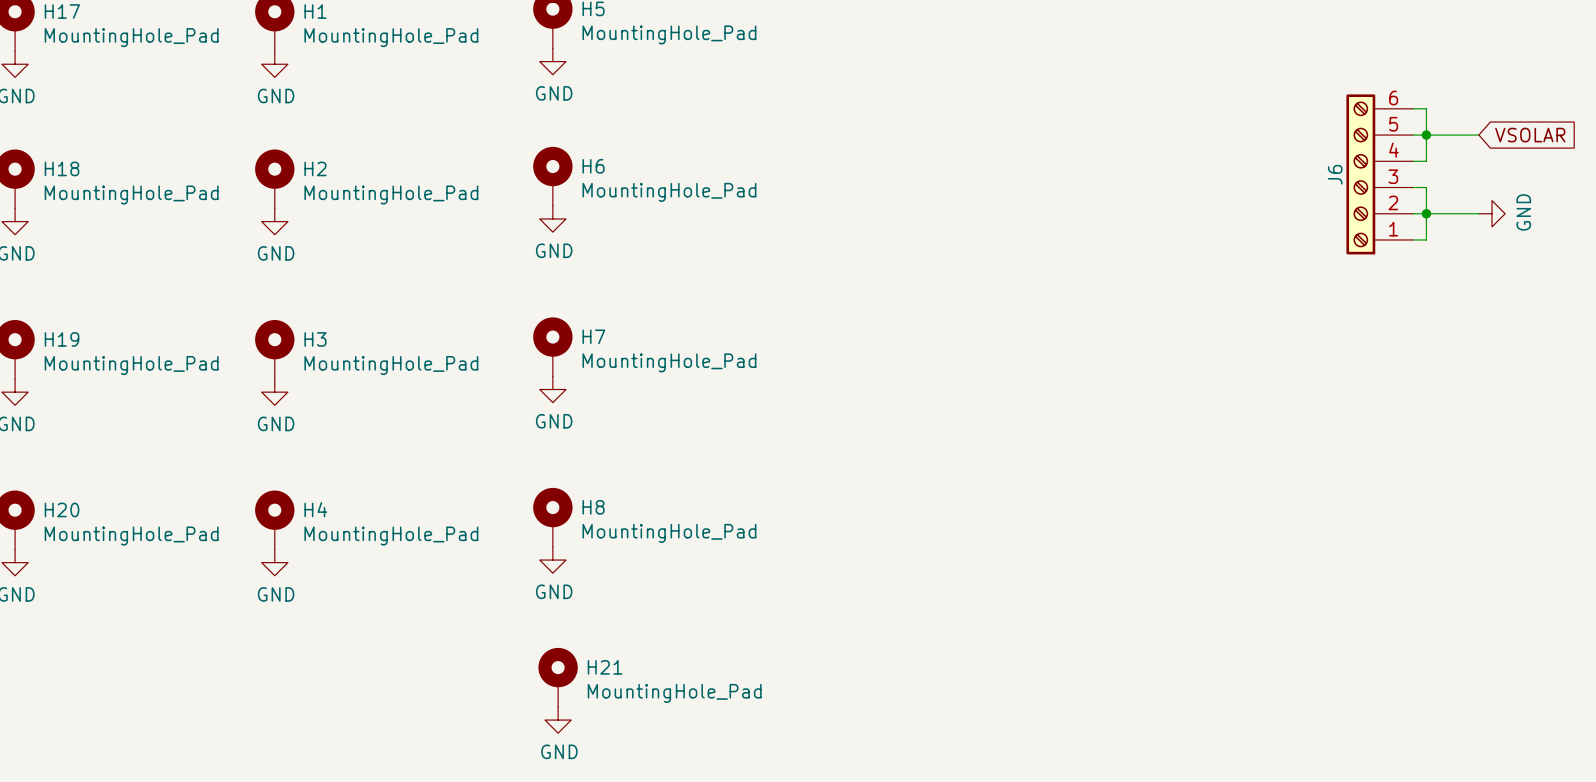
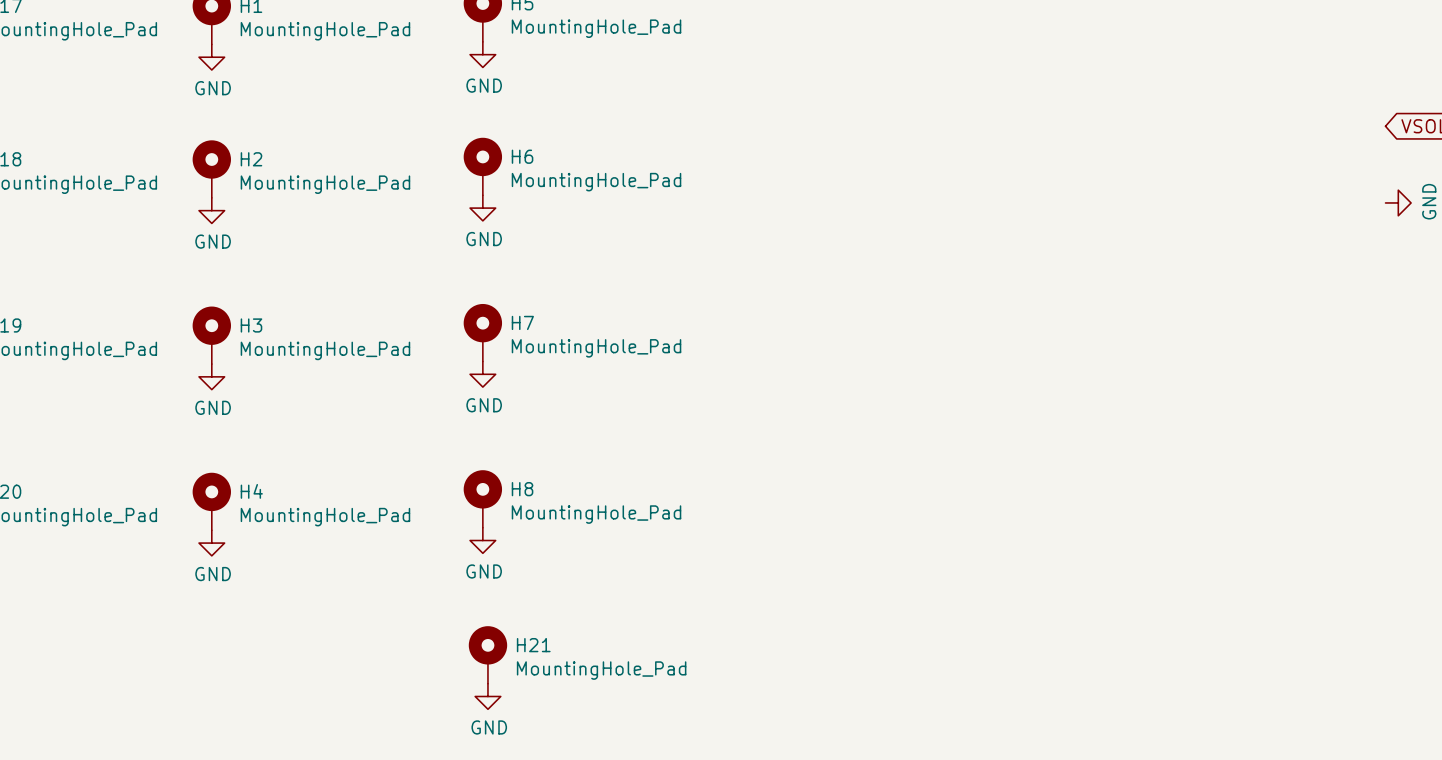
wire: (1413, 108) (1426, 108) (1426, 161) (1413, 161) -> none
wire: (1413, 135) (1478, 135) -> none
junction: (1426, 135) -> none
J6: (1379, 174) -> none
wire: (1413, 187) (1426, 187) (1426, 239) (1413, 239) -> none
wire: (1413, 213) (1478, 213) -> none
junction: (1426, 213) -> none

